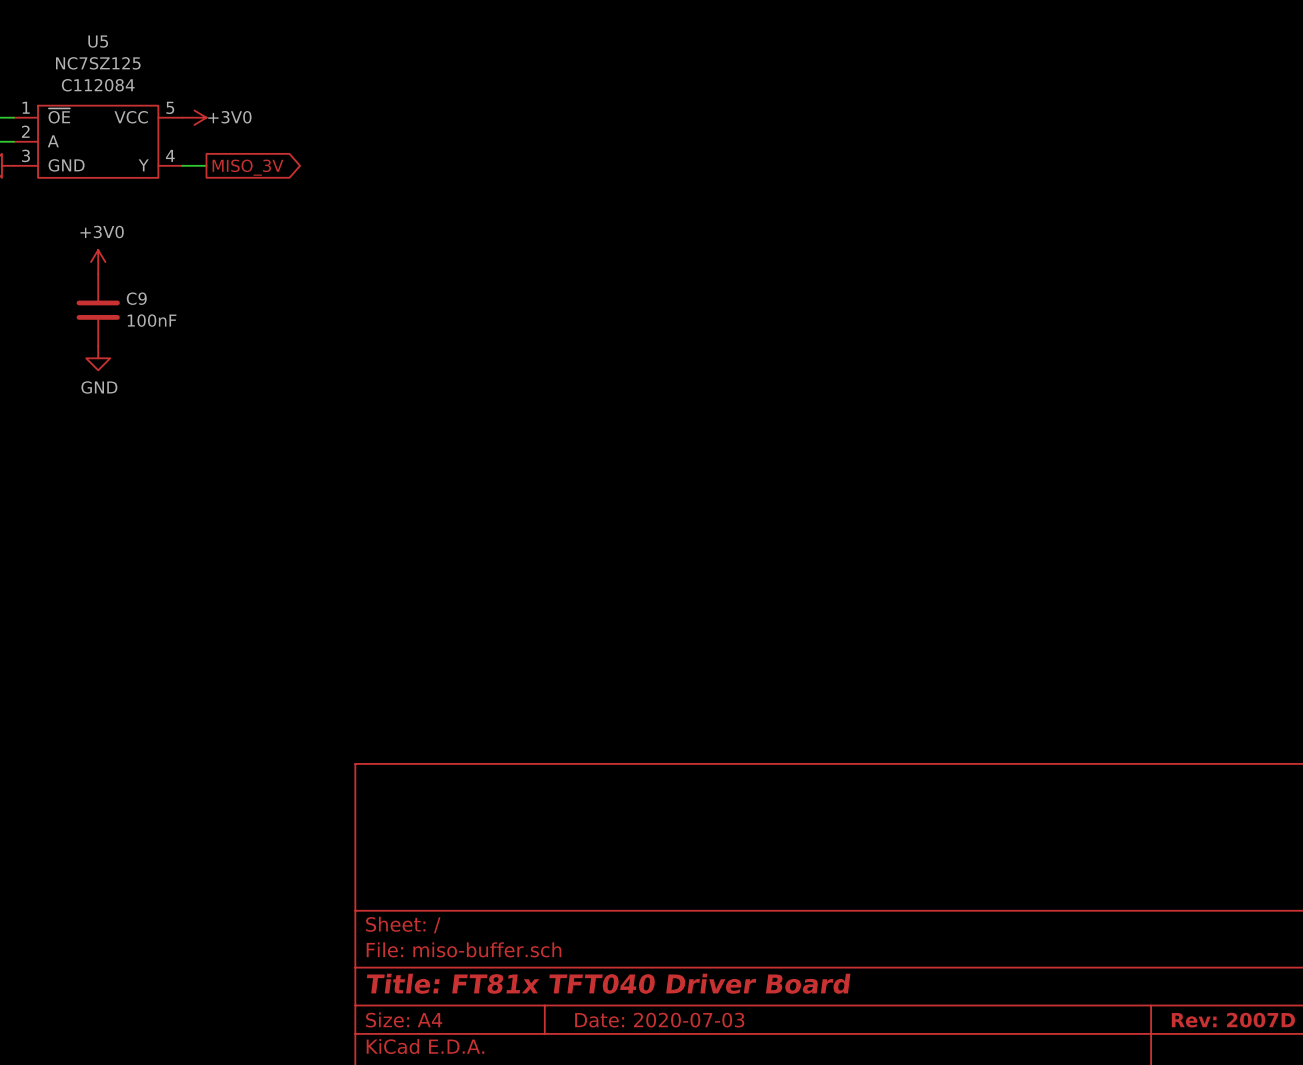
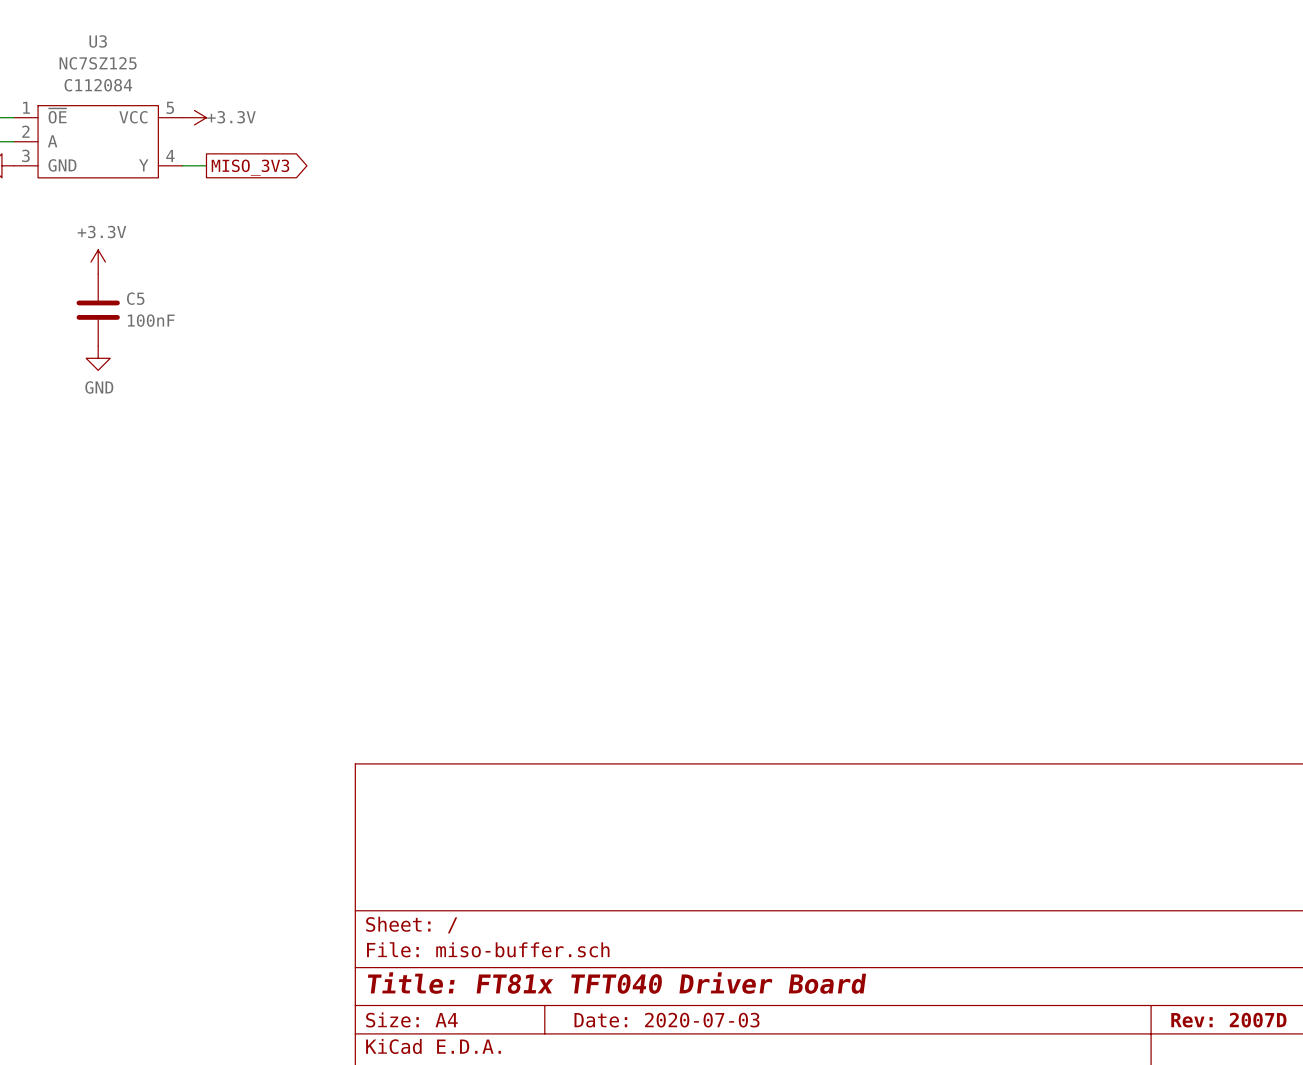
U5 name: U5 (98, 41) -> U3 (98, 41)
power symbol: +3V0 (194, 117) -> +3.3V (194, 117)
global label: MISO_3V (248, 167) -> MISO_3V3 (250, 167)
power symbol: +3V0 (98, 262) -> +3.3V (98, 262)
C9 name: C9 (136, 298) -> C5 (135, 298)

